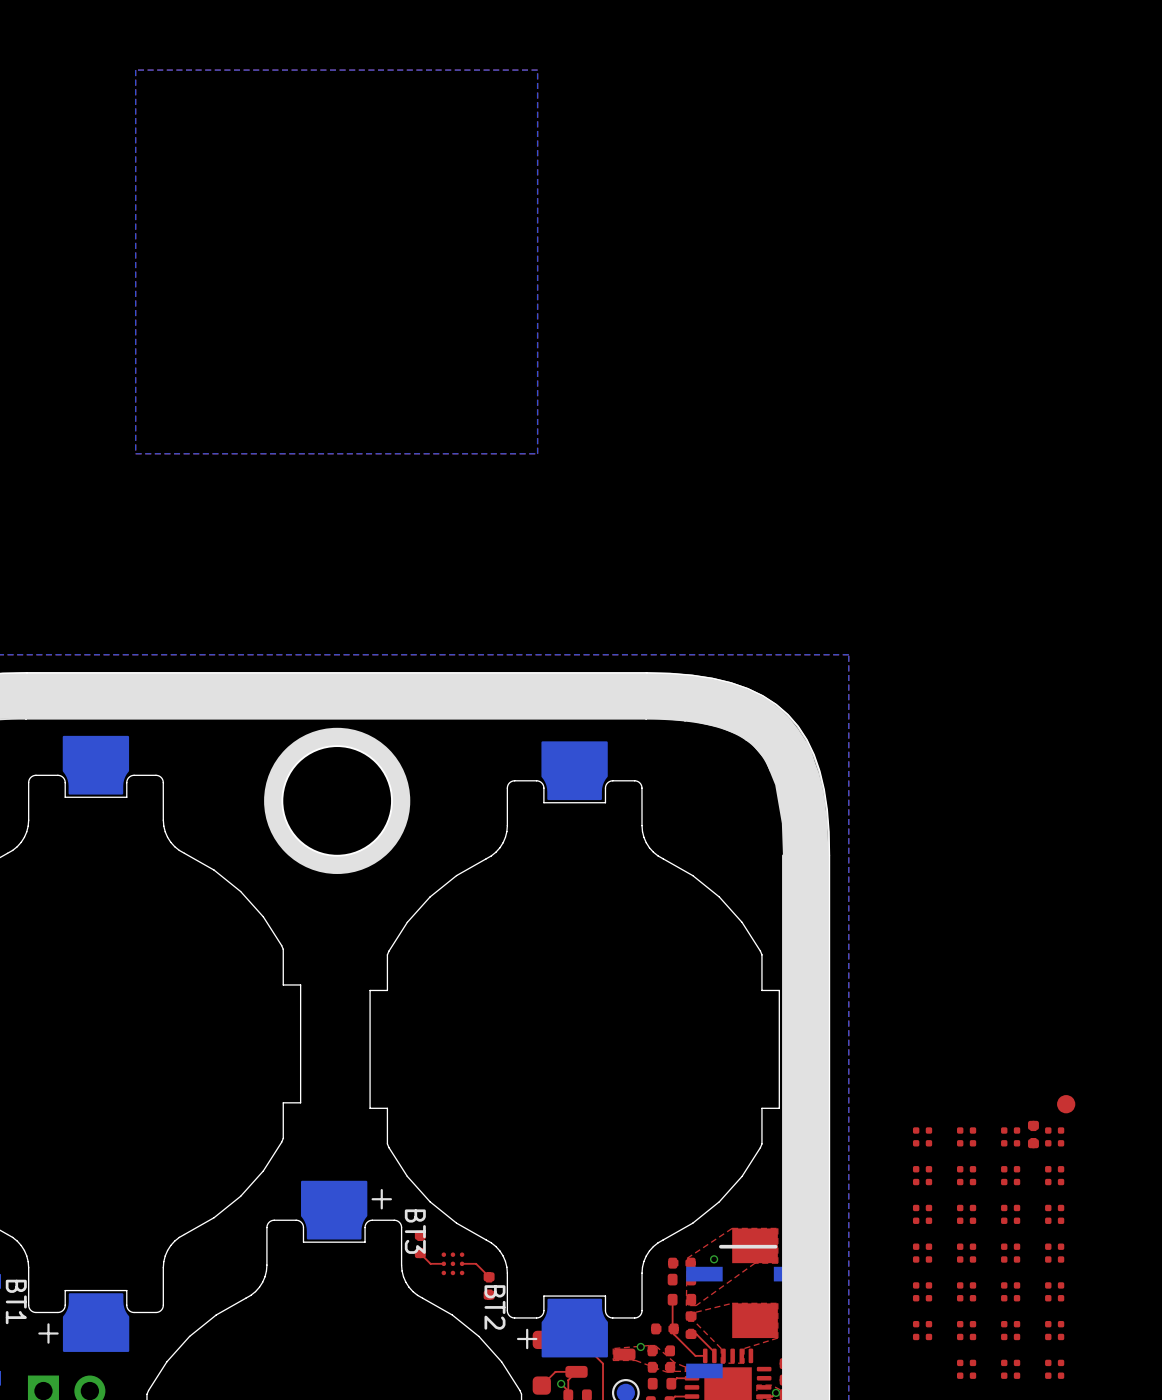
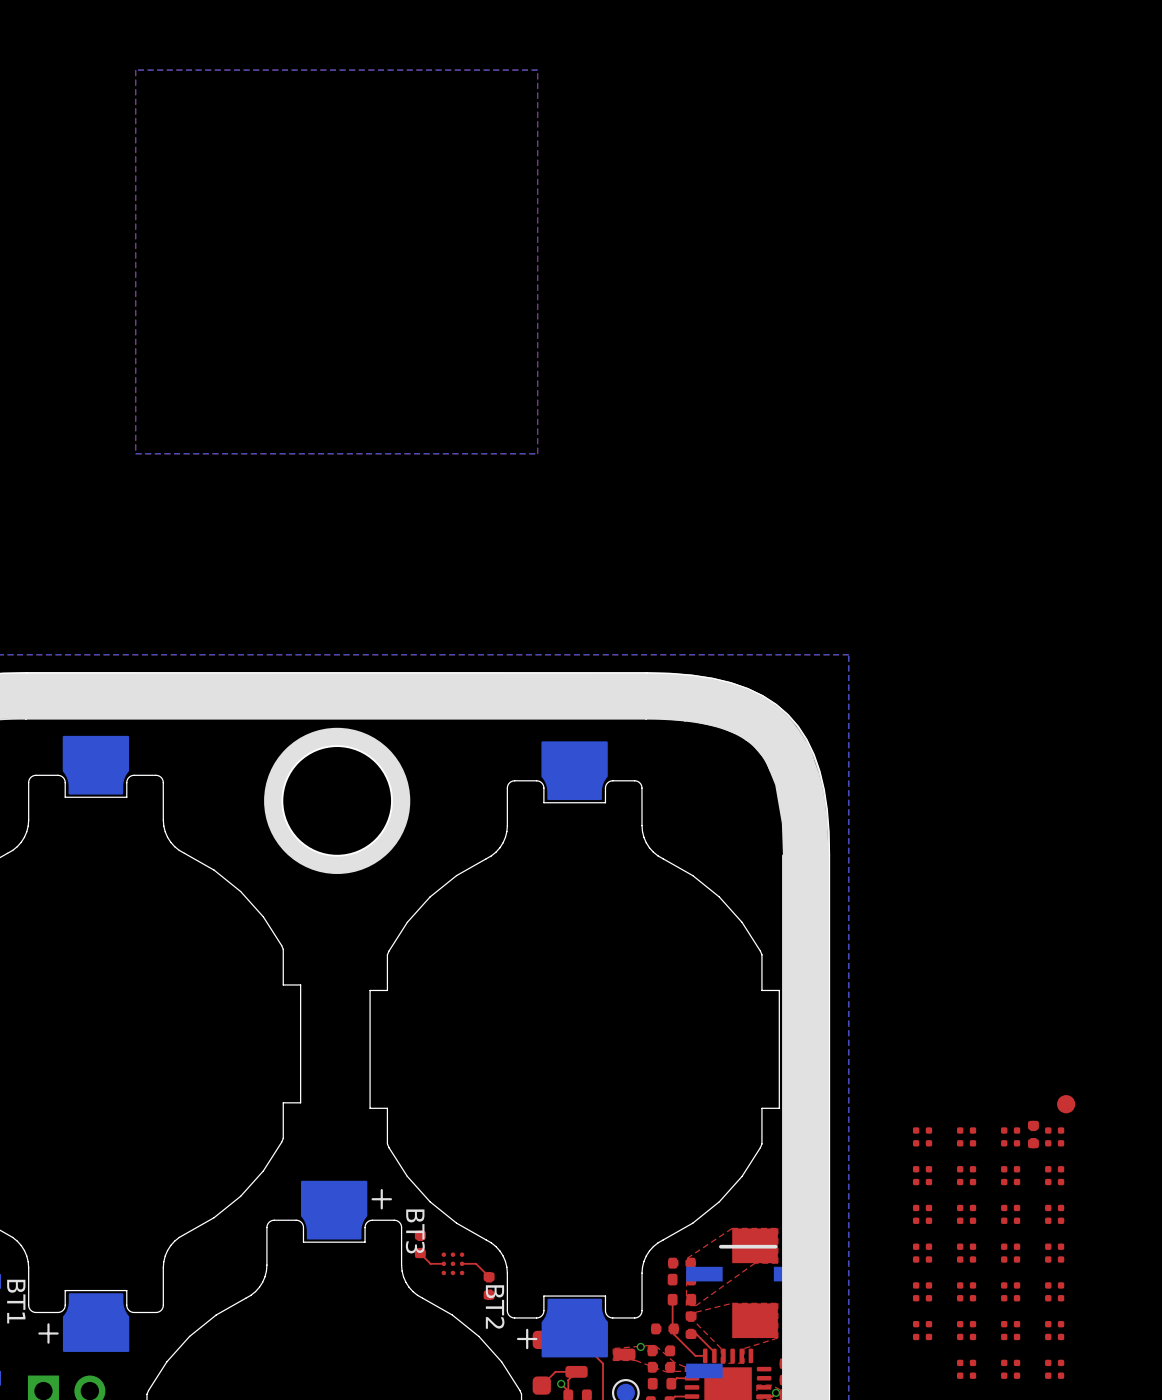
via: (714, 1259) -> none

